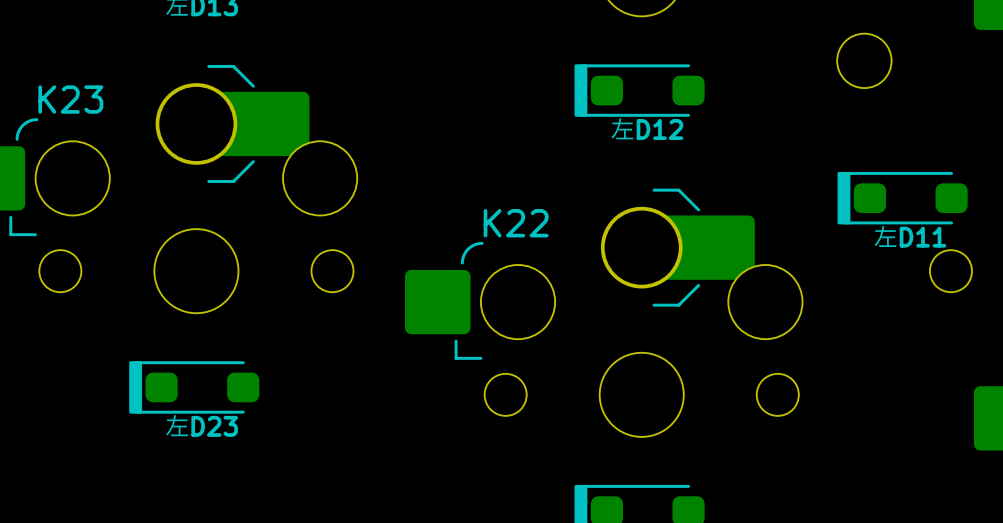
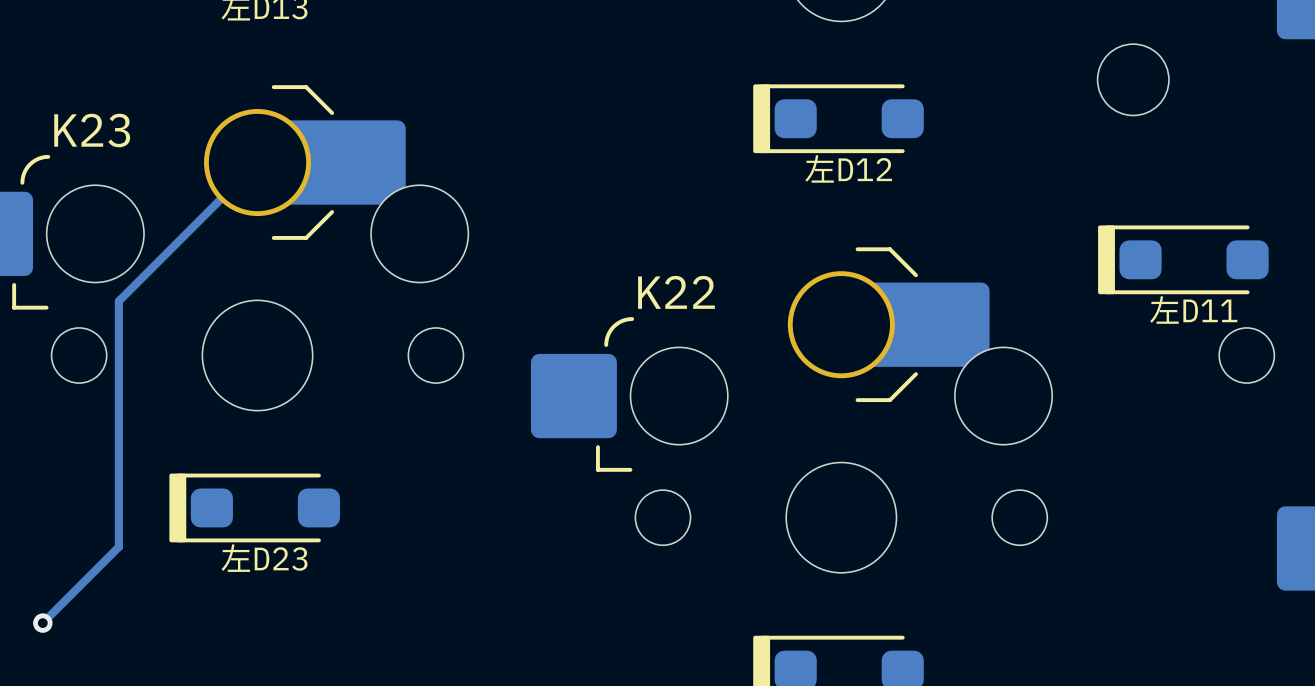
track: none -> (257, 162) (118, 301) (118, 547) (42, 623)
via: none -> (42, 623)

